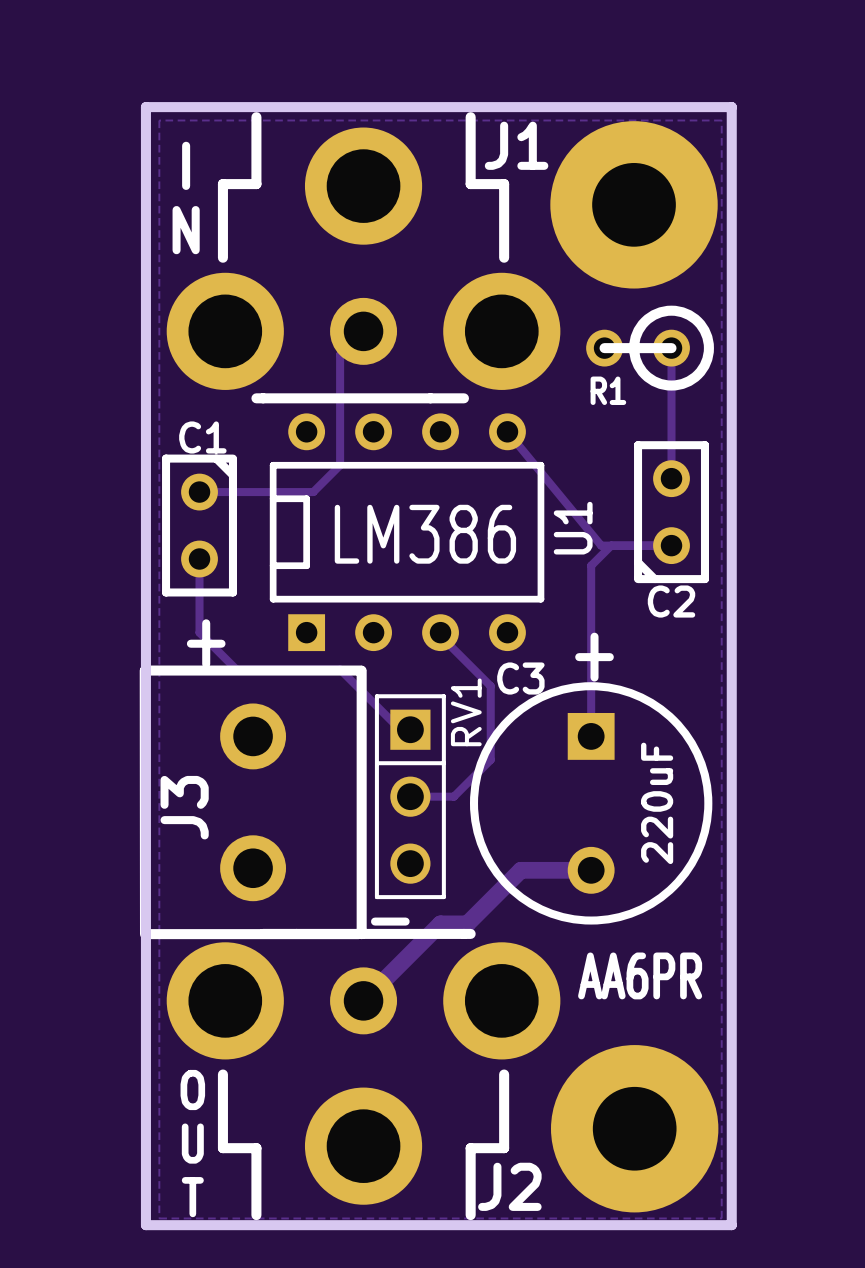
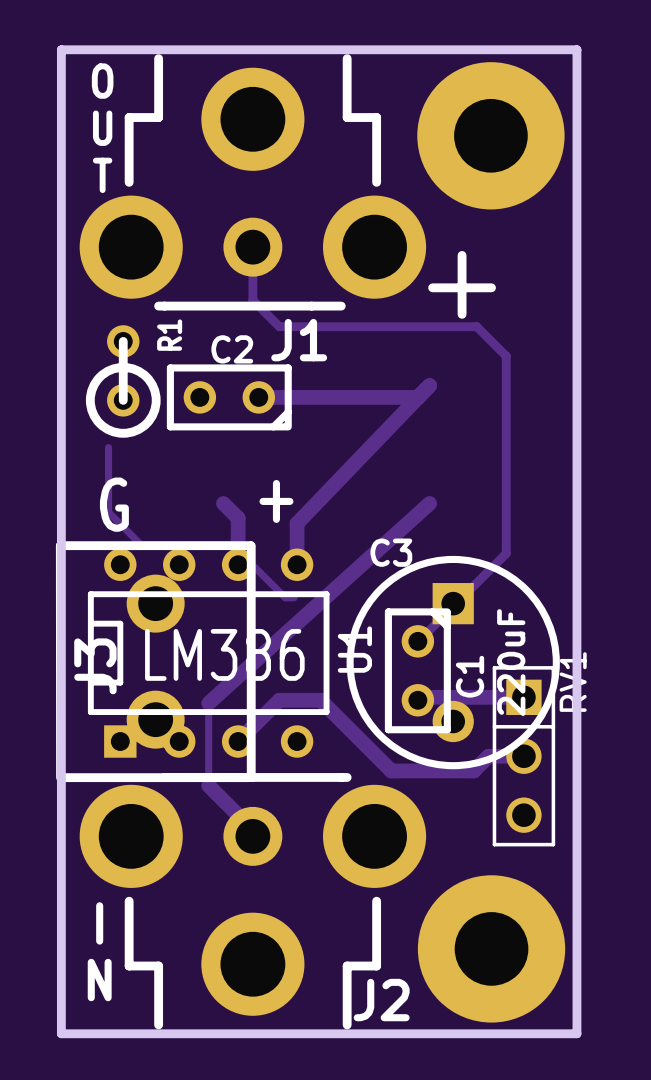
zone outline: (159, 120) (721, 120) (721, 1218) (159, 1218) (159, 120) -> none
text: none -> O (102, 81)
J1 name position: J1 (516, 145) -> J1 (299, 340)
text: I (186, 165) -> none
text: none -> U (102, 128)
text: N (186, 230) -> none
text: none -> T (102, 175)
track: (363, 331) (340, 354) (340, 465) (313, 492) (199, 492) -> (252, 247) (252, 300) (279, 326) (476, 326) (506, 356) (506, 553) (417, 641)
line: none -> (462, 255) (462, 314)
R1 rotation: 0° (650, 348) -> 90° clockwise (123, 381)
R1 position: (650, 348) -> (123, 381)
track: (671, 348) (671, 478) -> none
line: none -> (432, 287) (491, 287)
R1 name position: R1 (608, 390) -> R1 (169, 335)
track: (507, 431) (601, 545) (671, 545) -> none
C1 name rotation: 0° (202, 437) -> 90° counterclockwise (470, 676)
C1 name position: C1 (202, 437) -> C1 (470, 676)
track: none -> (258, 397) (417, 397) (429, 385) (297, 523) (297, 564)
C2 rotation: 0° (671, 512) -> 90° counterclockwise (229, 397)
C2 position: (671, 512) -> (229, 397)
C1 position: (199, 525) -> (417, 670)
U1 position: (407, 532) -> (208, 653)
track: (611, 545) (591, 565) (591, 736) -> none
C2 name position: C2 (671, 601) -> C2 (232, 349)
text: none -> + (276, 501)
track: none -> (223, 503) (238, 518) (238, 564)
track: (440, 632) (440, 636) (490, 686) (490, 759) (453, 796) (410, 796) -> none
text: + (206, 643) -> G (114, 504)
text: + (594, 657) -> none
RV1 position: (410, 796) -> (523, 756)
track: none -> (523, 697) (420, 697) (417, 700)
track: (591, 870) (520, 870) (467, 923) (440, 923) (363, 1000) -> (429, 503) (208, 703) (208, 785) (252, 829) (252, 836)
track: none -> (238, 741) (279, 700) (320, 700) (391, 770) (473, 770) (488, 756) (523, 756)
text: - (390, 921) -> none
text: AA6PR (640, 975) -> none
text: O (192, 1090) -> I (99, 923)
text: U (192, 1143) -> none
text: none -> N (99, 980)
text: T (192, 1197) -> none

